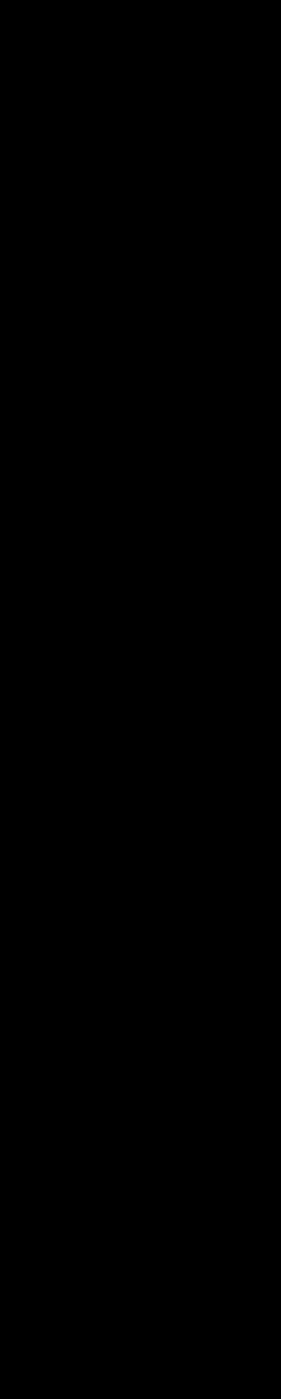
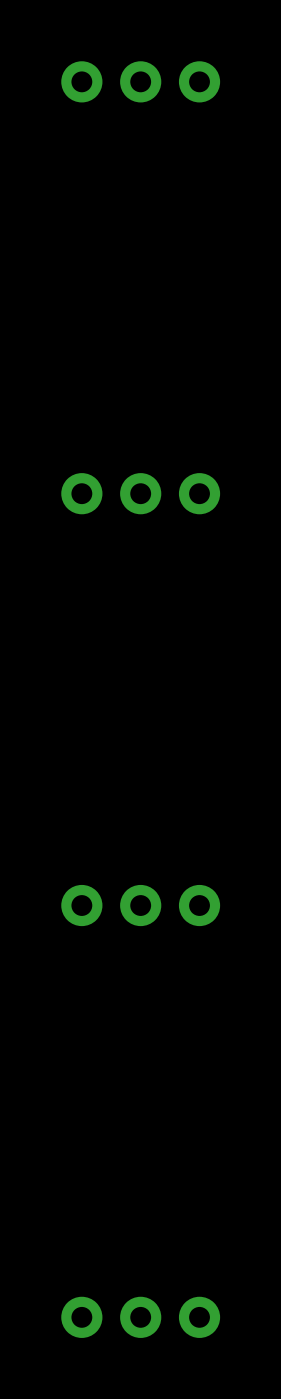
part: none -> (140, 81)
part: none -> (140, 493)
part: none -> (140, 905)
part: none -> (140, 1317)

